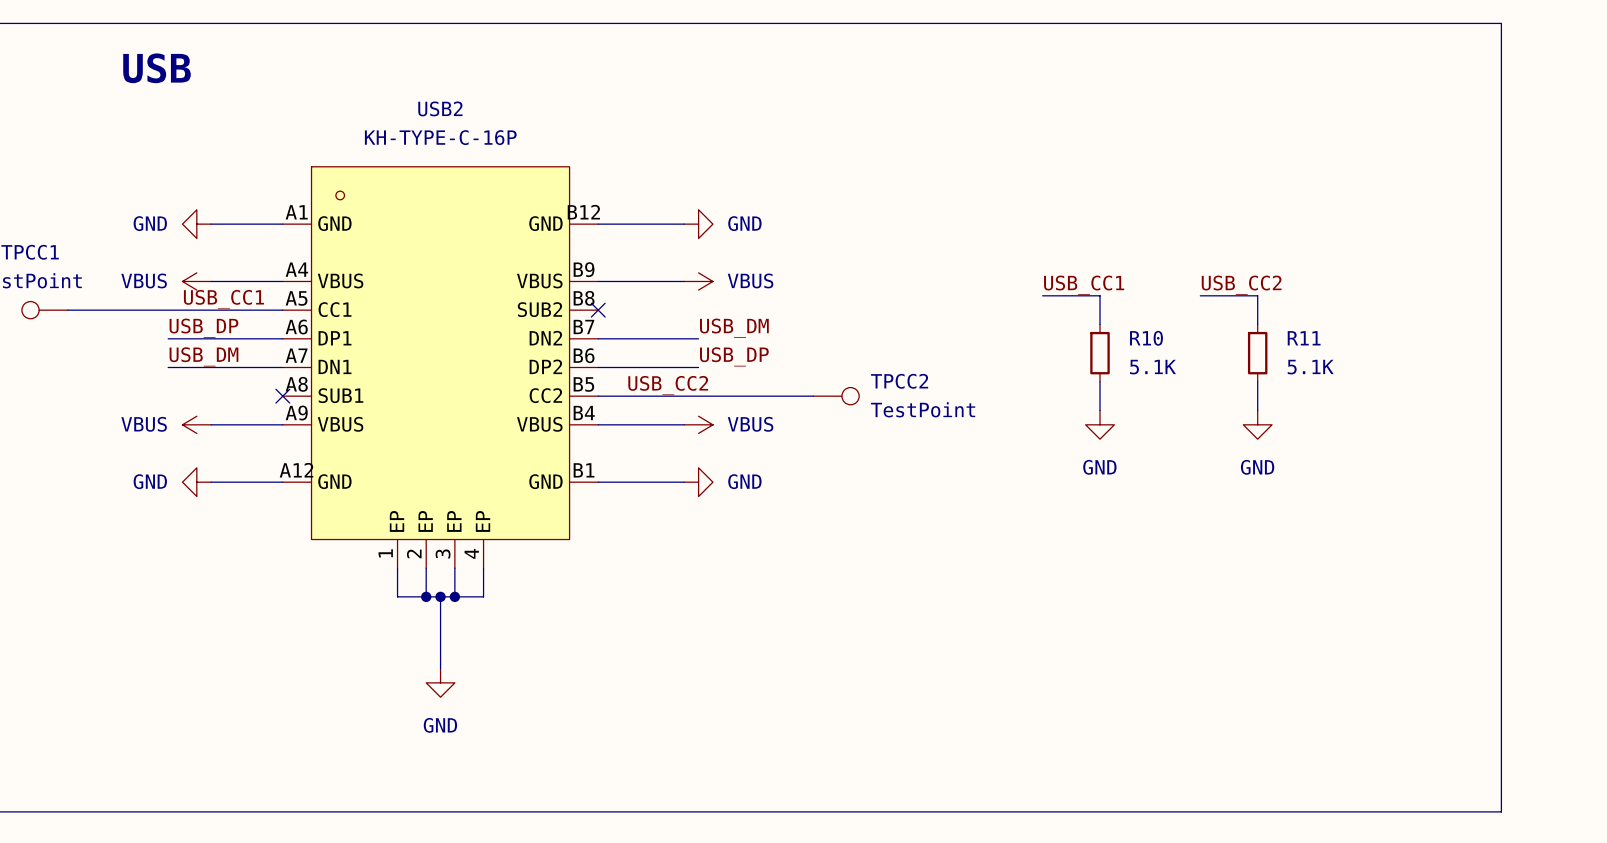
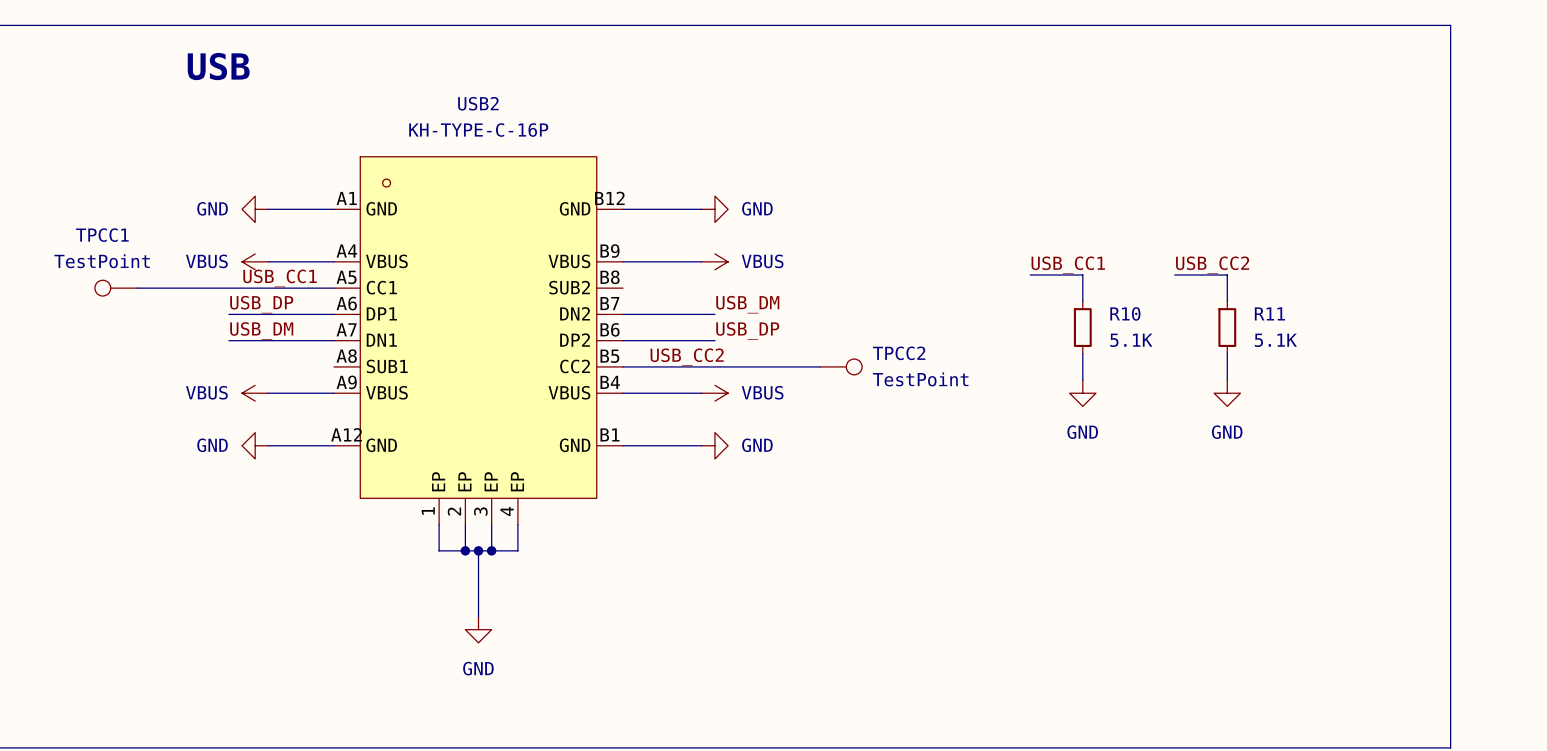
no-connect mark: (598, 310) -> none
no-connect mark: (282, 396) -> none

